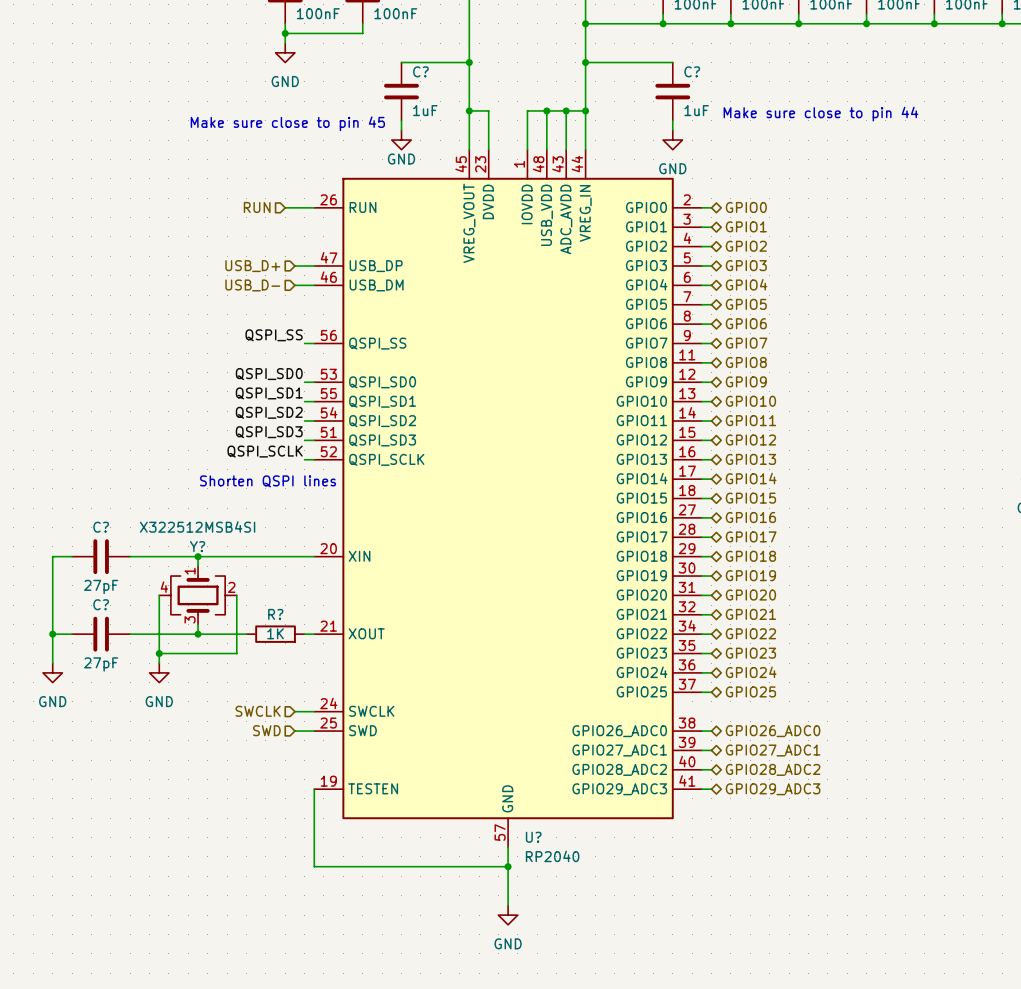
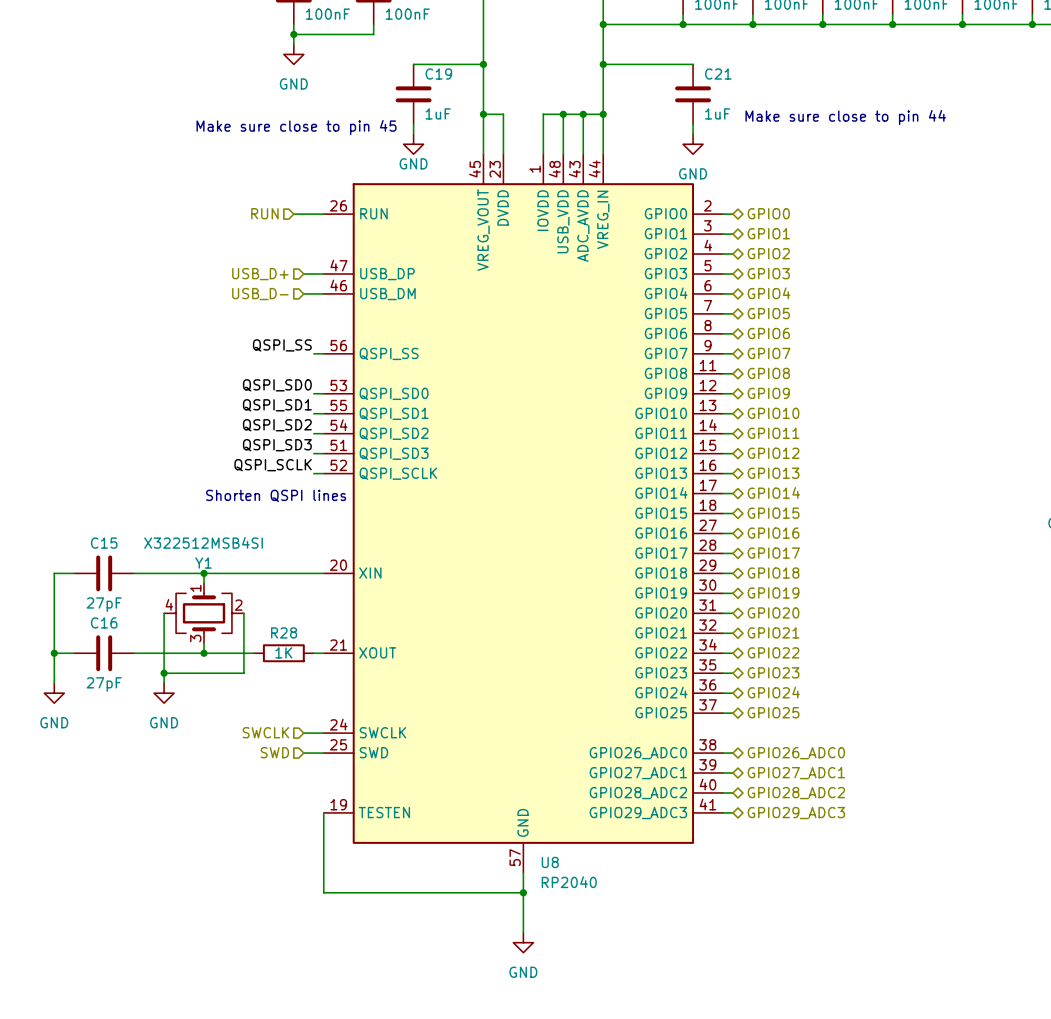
C? name: C? (420, 71) -> C19 (438, 74)
C? name: C? (692, 71) -> C21 (718, 74)
C? name: C? (101, 527) -> C15 (104, 543)
Y? name: Y? (197, 546) -> Y1 (203, 563)
C? name: C? (101, 604) -> C16 (104, 622)
R? name: R? (275, 614) -> R28 (284, 632)
U? name: U? (533, 837) -> U8 (550, 862)

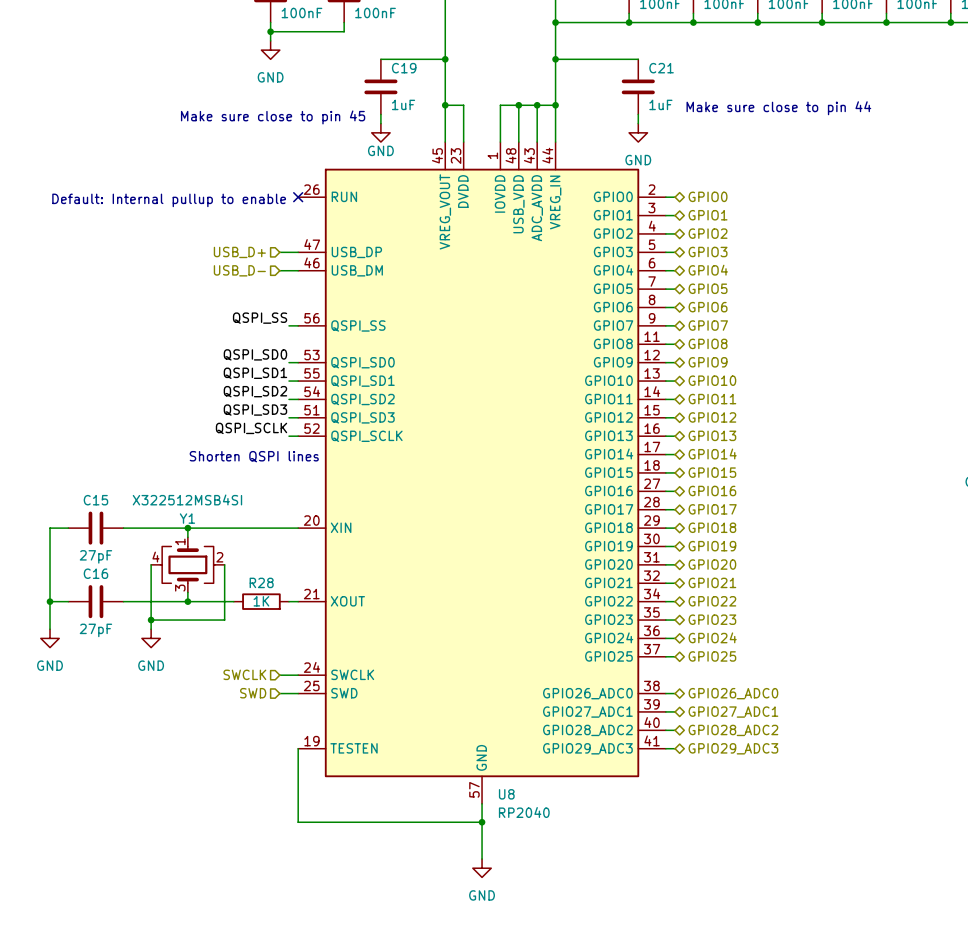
hierarchical label: RUN (264, 213) -> none
wire: (293, 214) (323, 214) -> none
no-connect mark: none -> (298, 197)
text: none -> Default: Internal pullup to enable (169, 200)

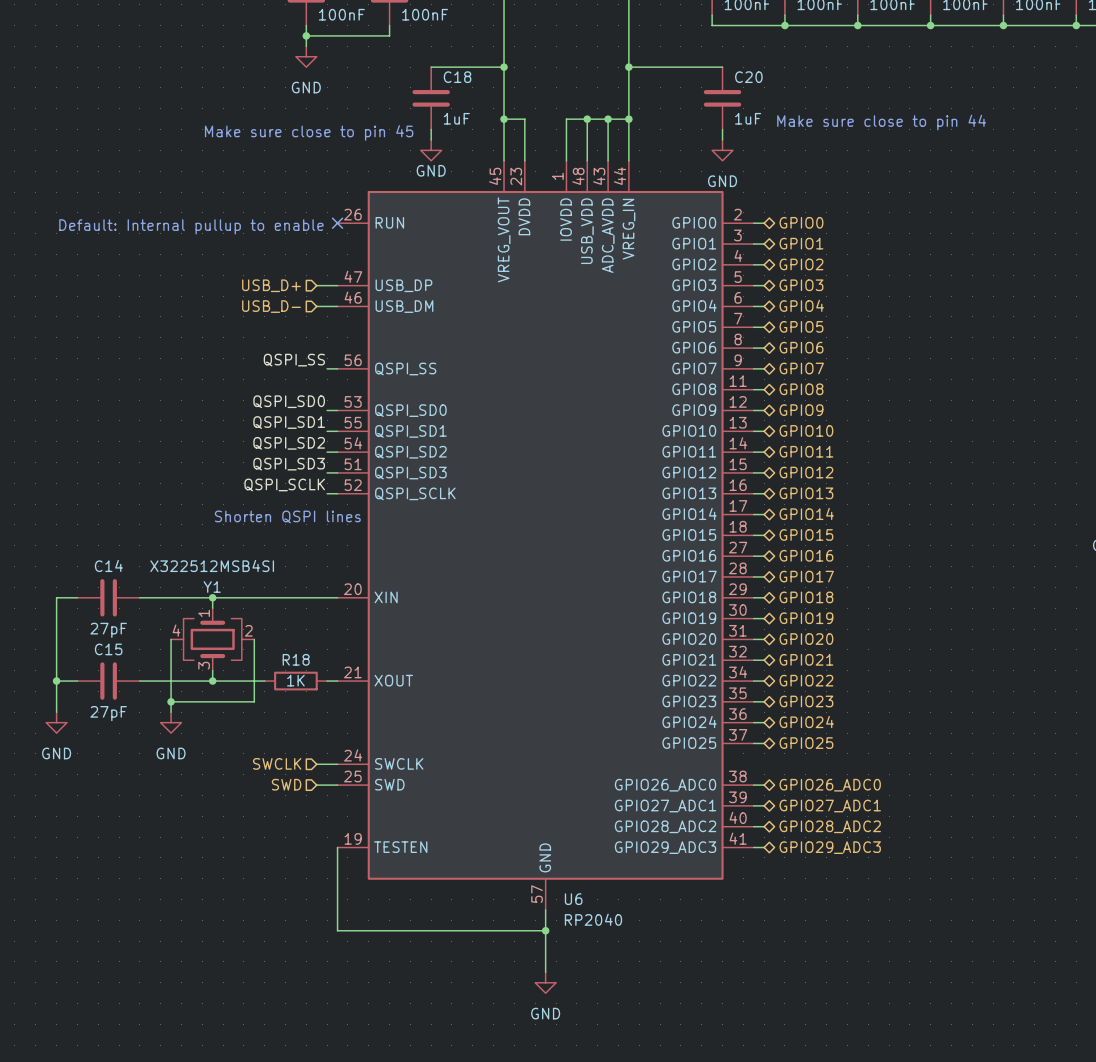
wire: (555, 22) (629, 22) -> none
junction: (555, 22) -> none
junction: (629, 22) -> none
C19 name: C19 (404, 68) -> C18 (457, 77)
C21 name: C21 (661, 68) -> C20 (748, 77)
C15 name: C15 (95, 500) -> C14 (108, 565)
C16 name: C16 (95, 573) -> C15 (108, 649)
R28 name: R28 (261, 582) -> R18 (296, 659)
U8 name: U8 (506, 794) -> U6 (573, 899)

